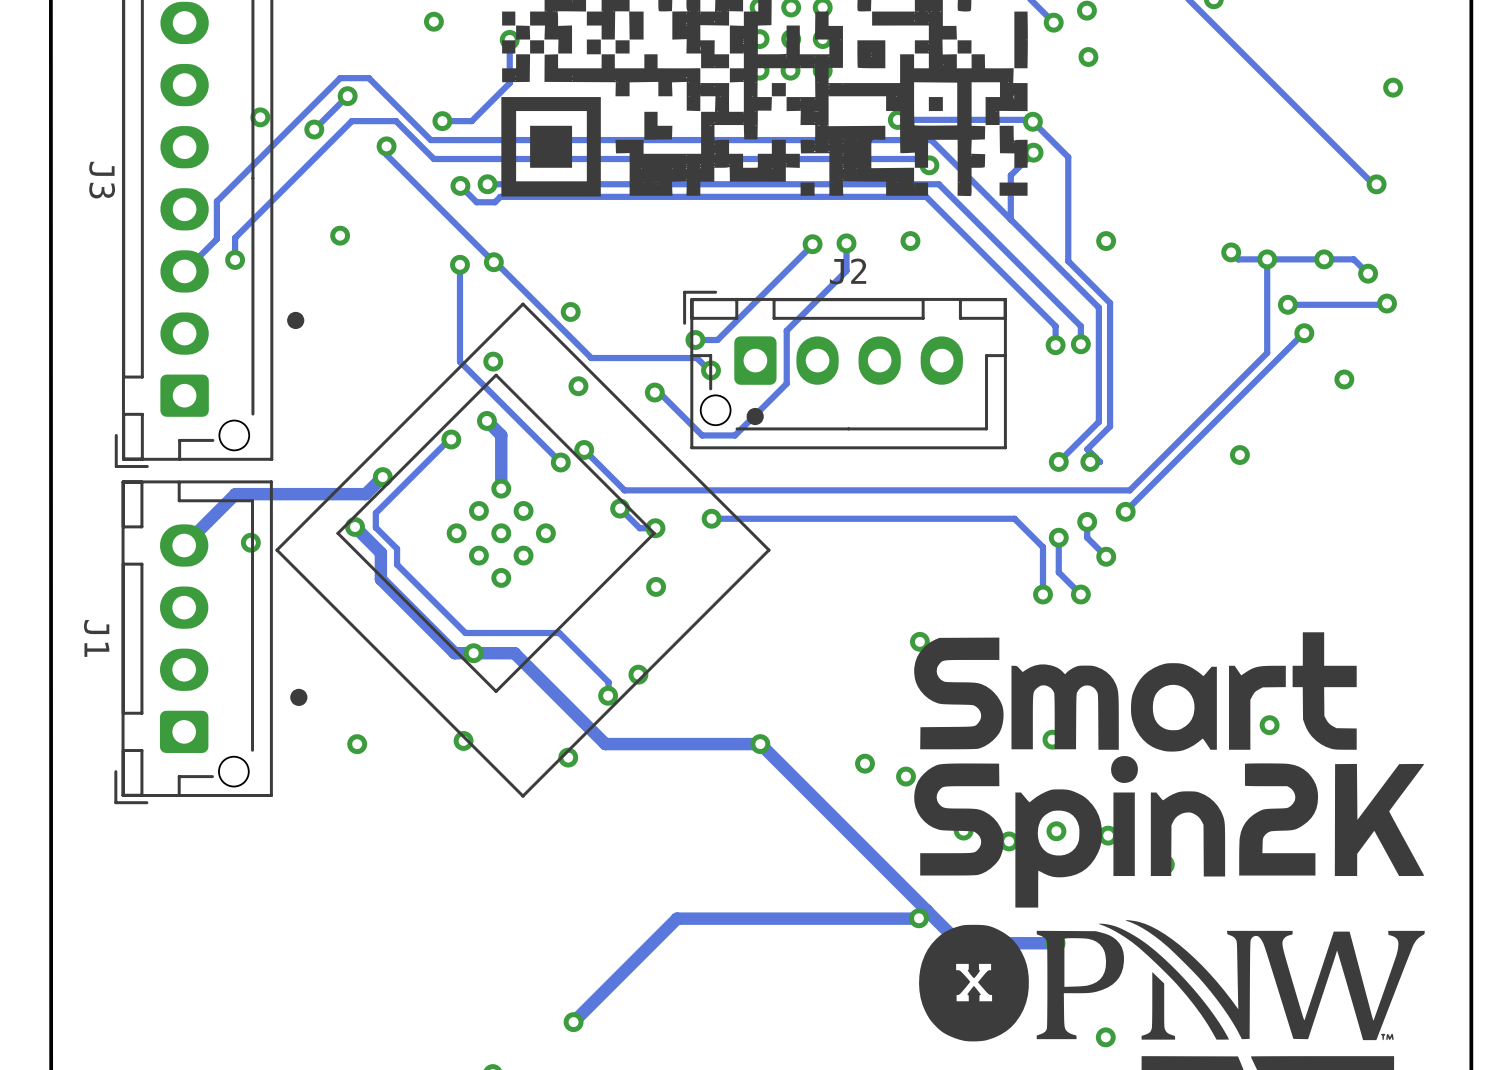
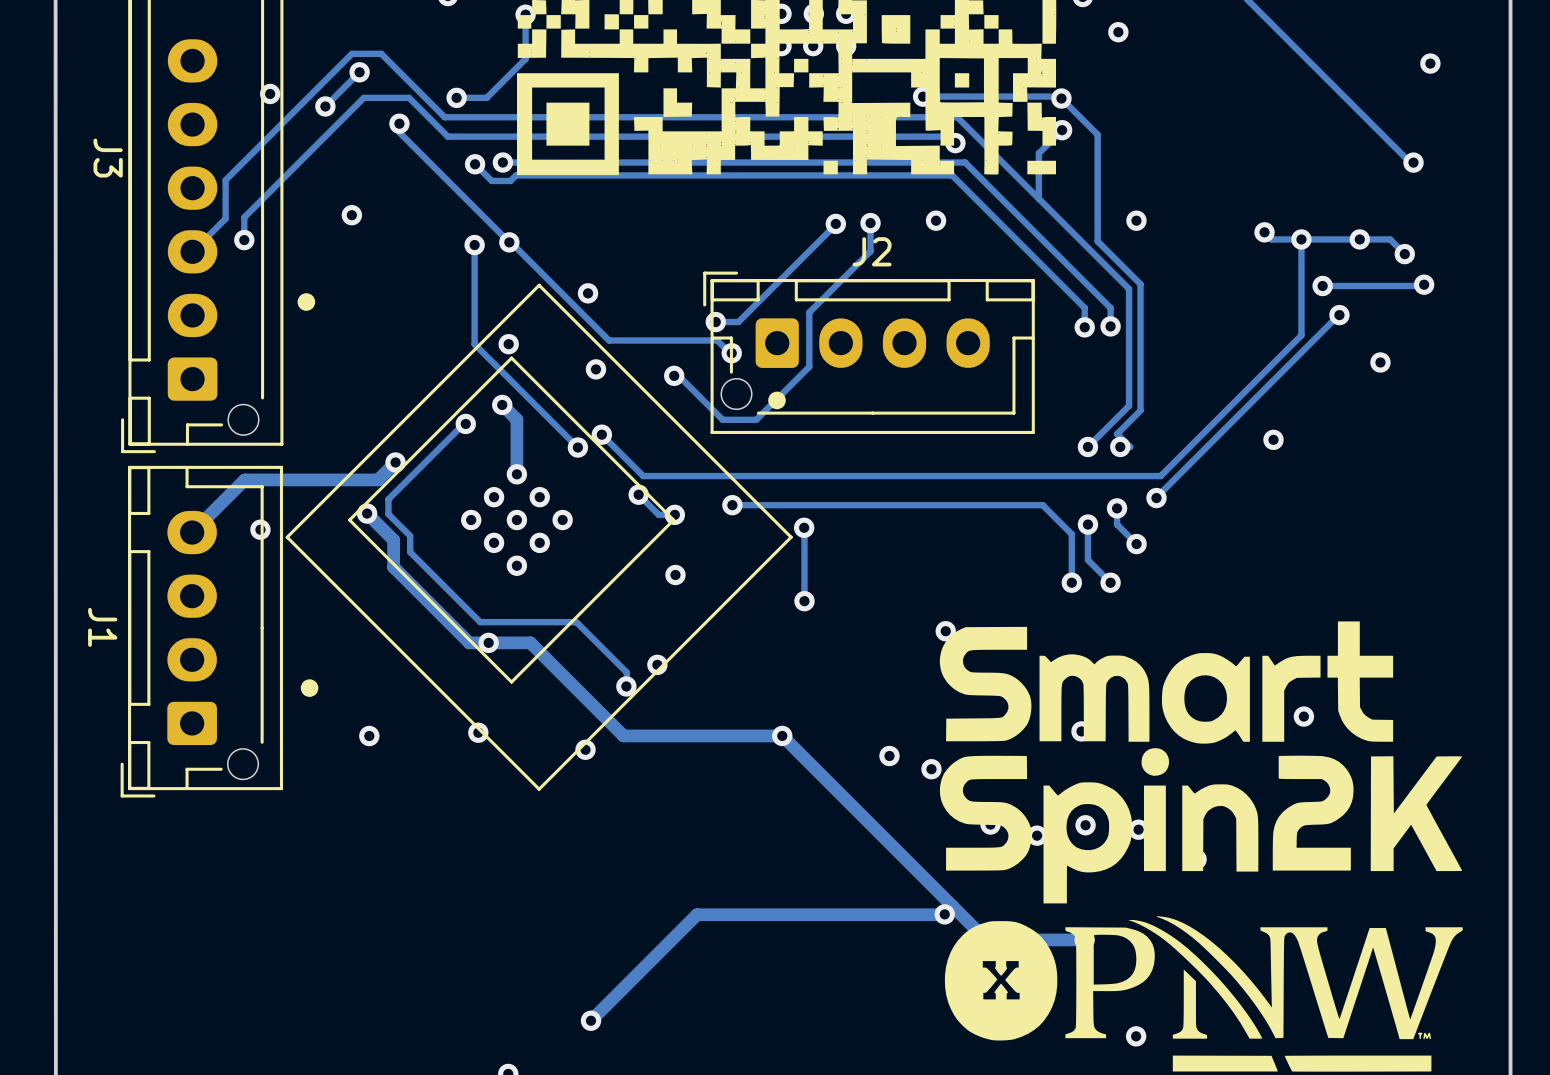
via: none -> (804, 527)
track: none -> (804, 528) (804, 601)
via: none -> (804, 601)

